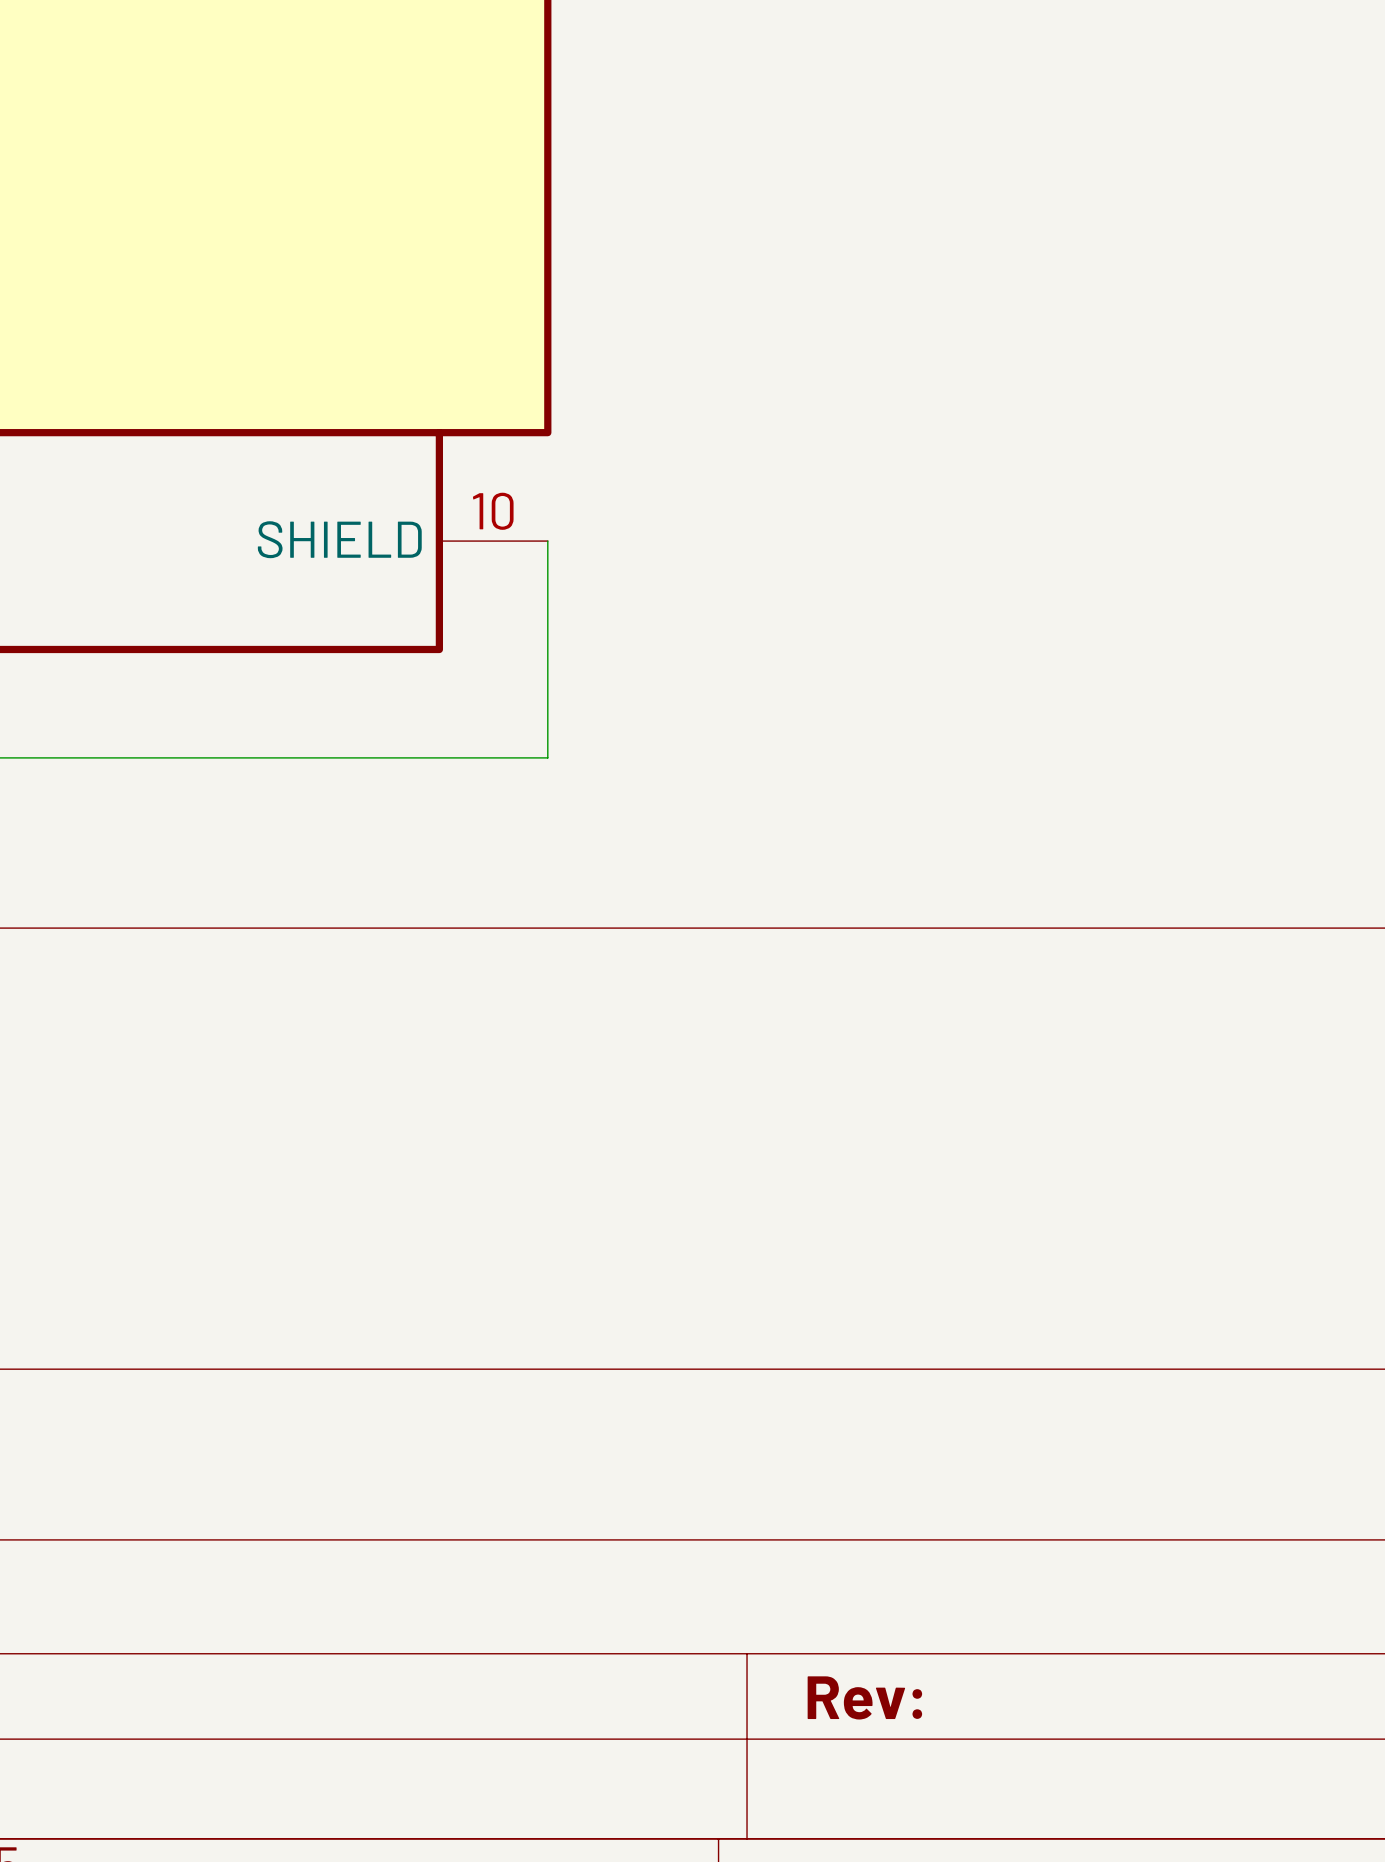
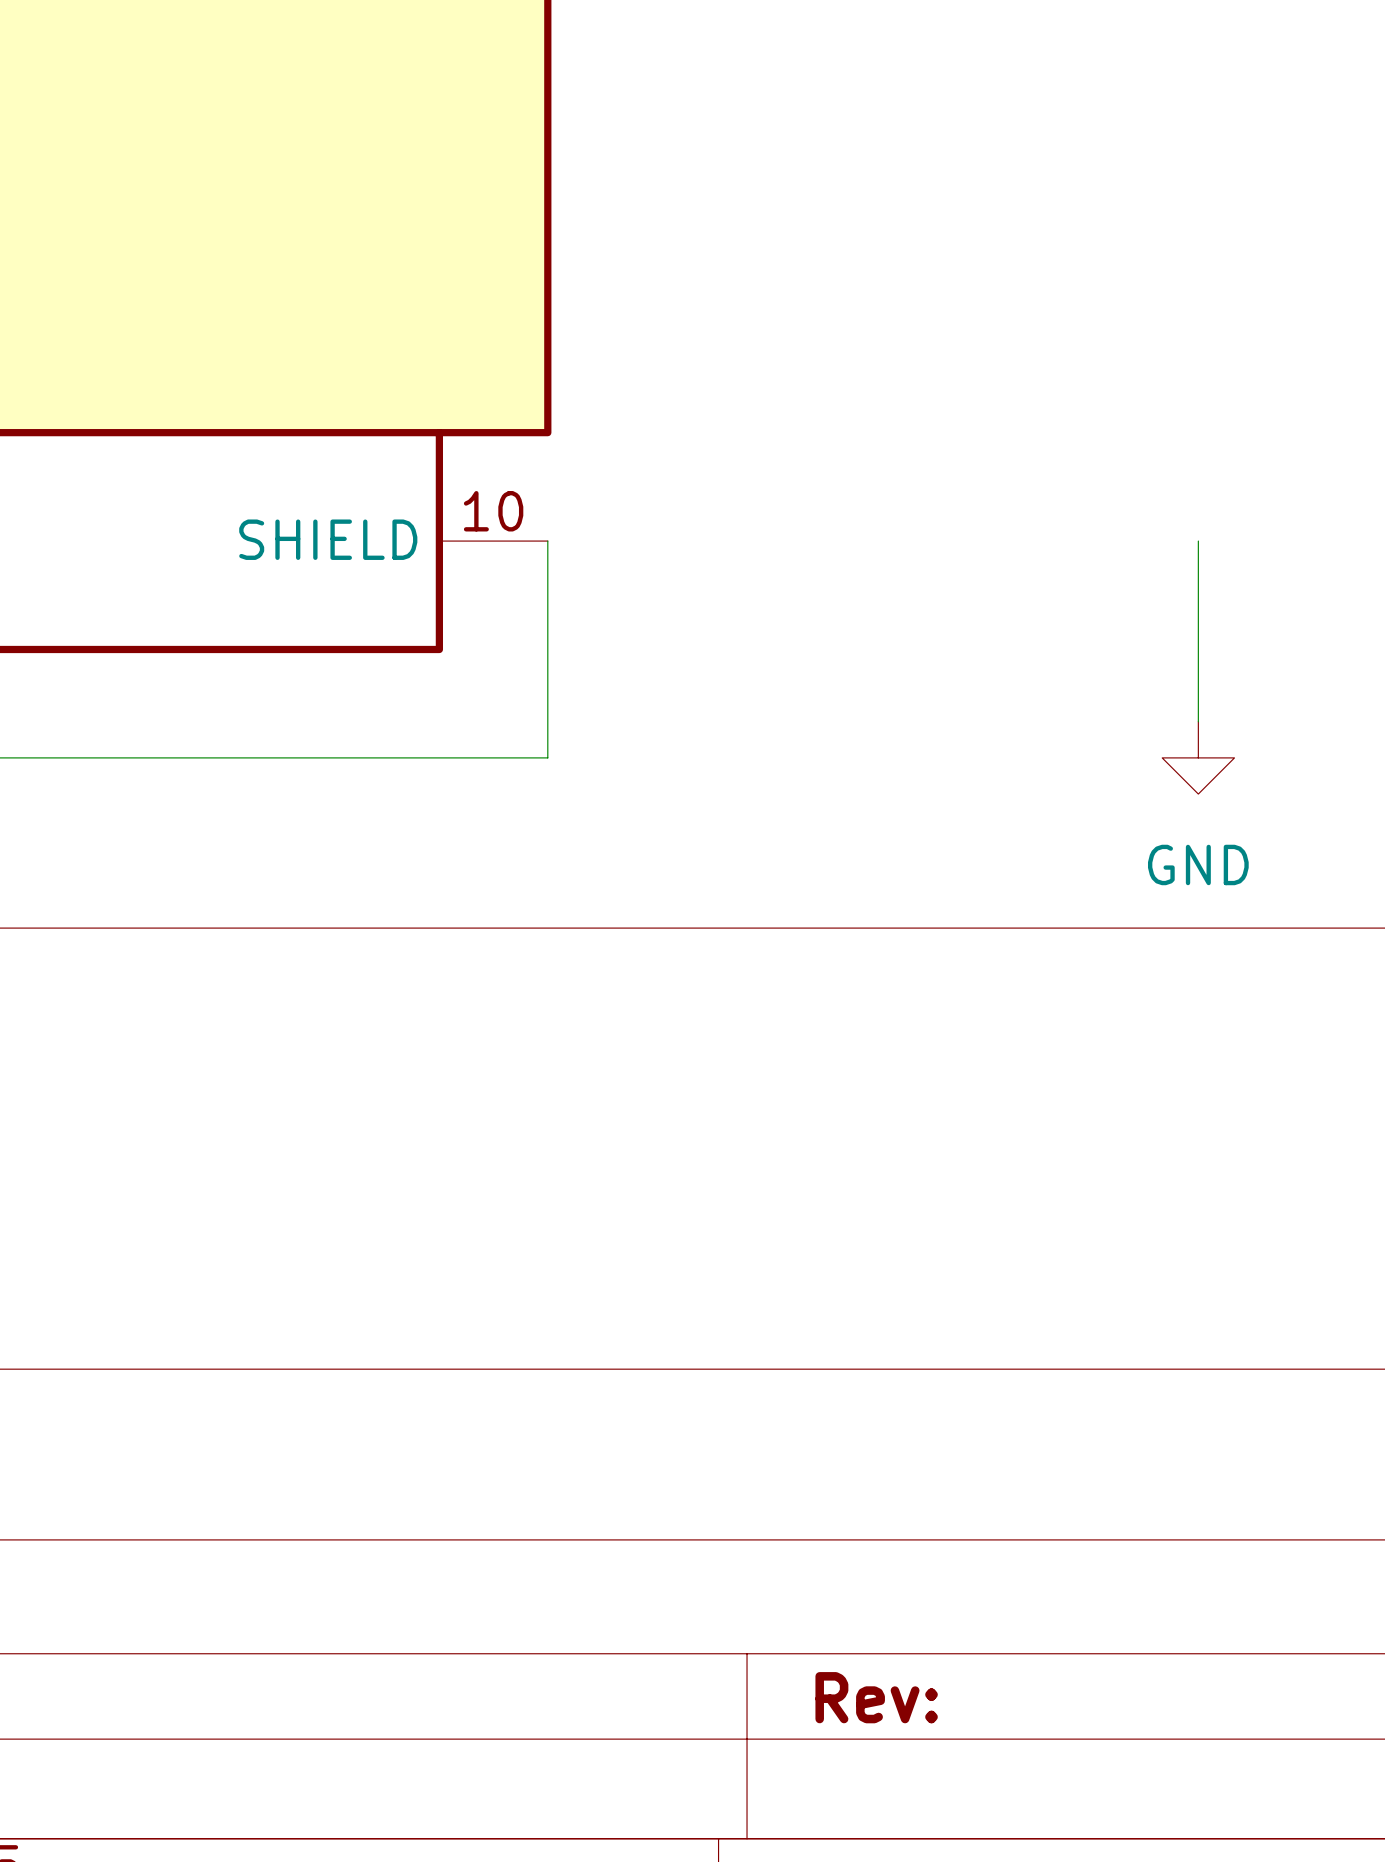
wire: none -> (1198, 541) (1198, 721)
power symbol: none -> GND (1198, 757)

